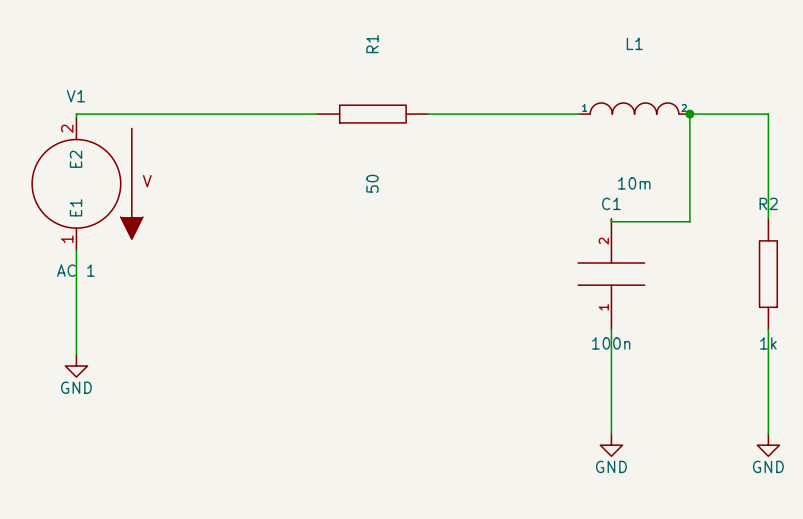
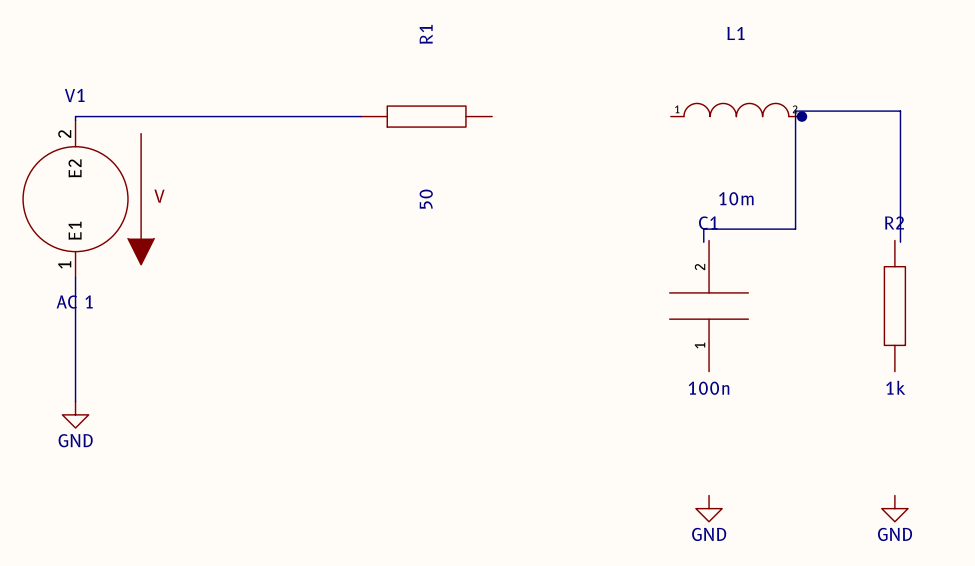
wire: (428, 114) (579, 114) -> none
wire: (611, 218) (611, 221) (689, 221) (689, 114) (768, 114) (768, 218) -> none
wire: none -> (703, 242) (703, 229) (795, 229) (795, 111) (900, 111) (900, 242)
wire: (611, 329) (611, 434) -> none
wire: (768, 329) (768, 434) -> none

